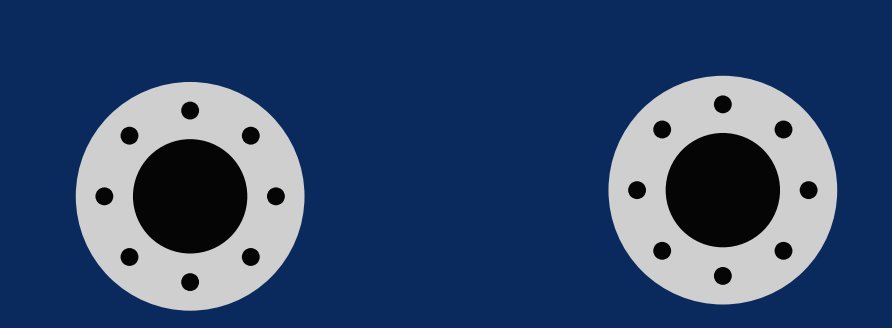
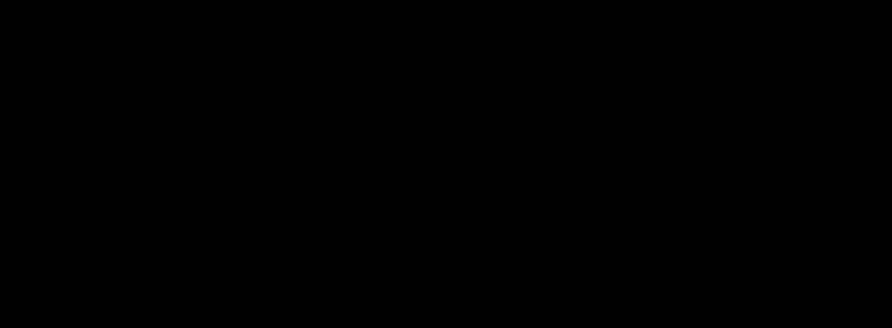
part: (722, 190) -> none
part: (190, 196) -> none

